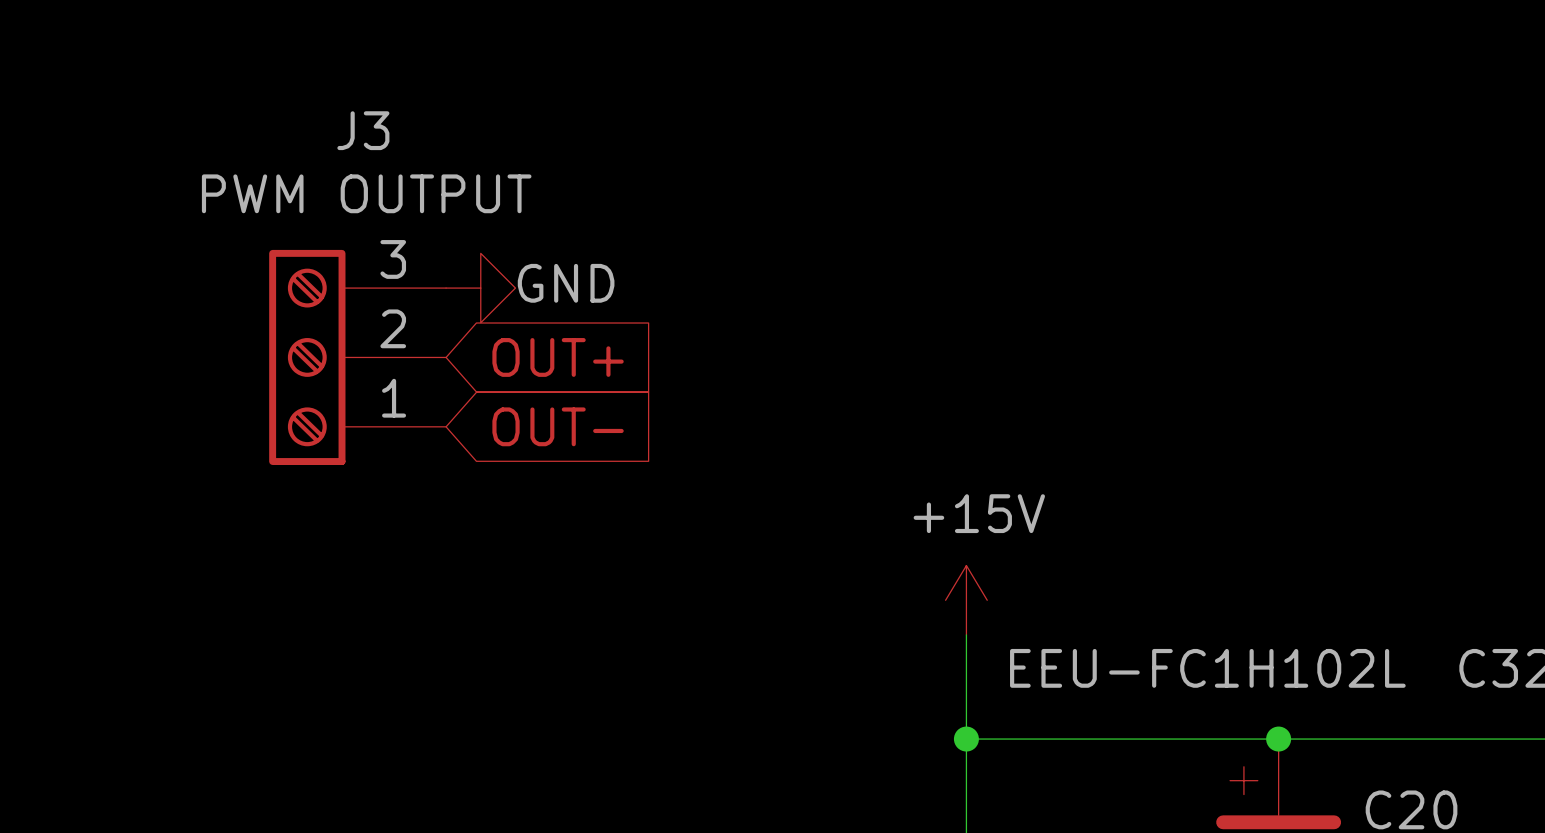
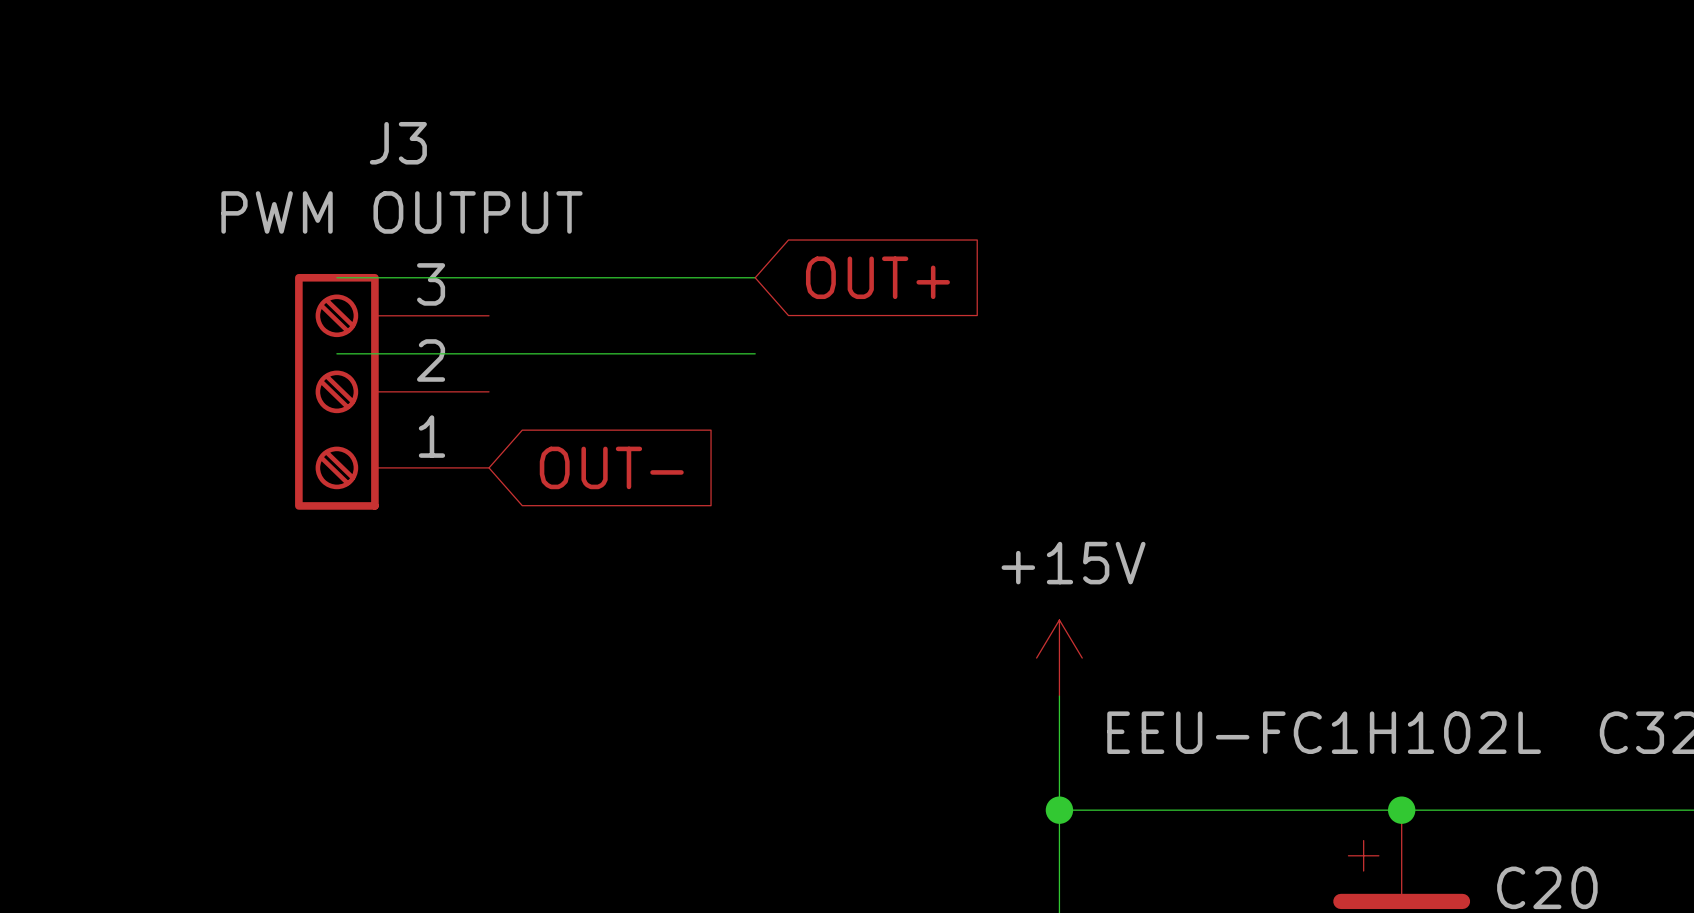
wire: none -> (336, 277) (755, 277)
power symbol: GND (480, 288) -> none
wire: none -> (336, 353) (755, 353)
global label position: OUT+ (558, 357) -> OUT+ (877, 277)

